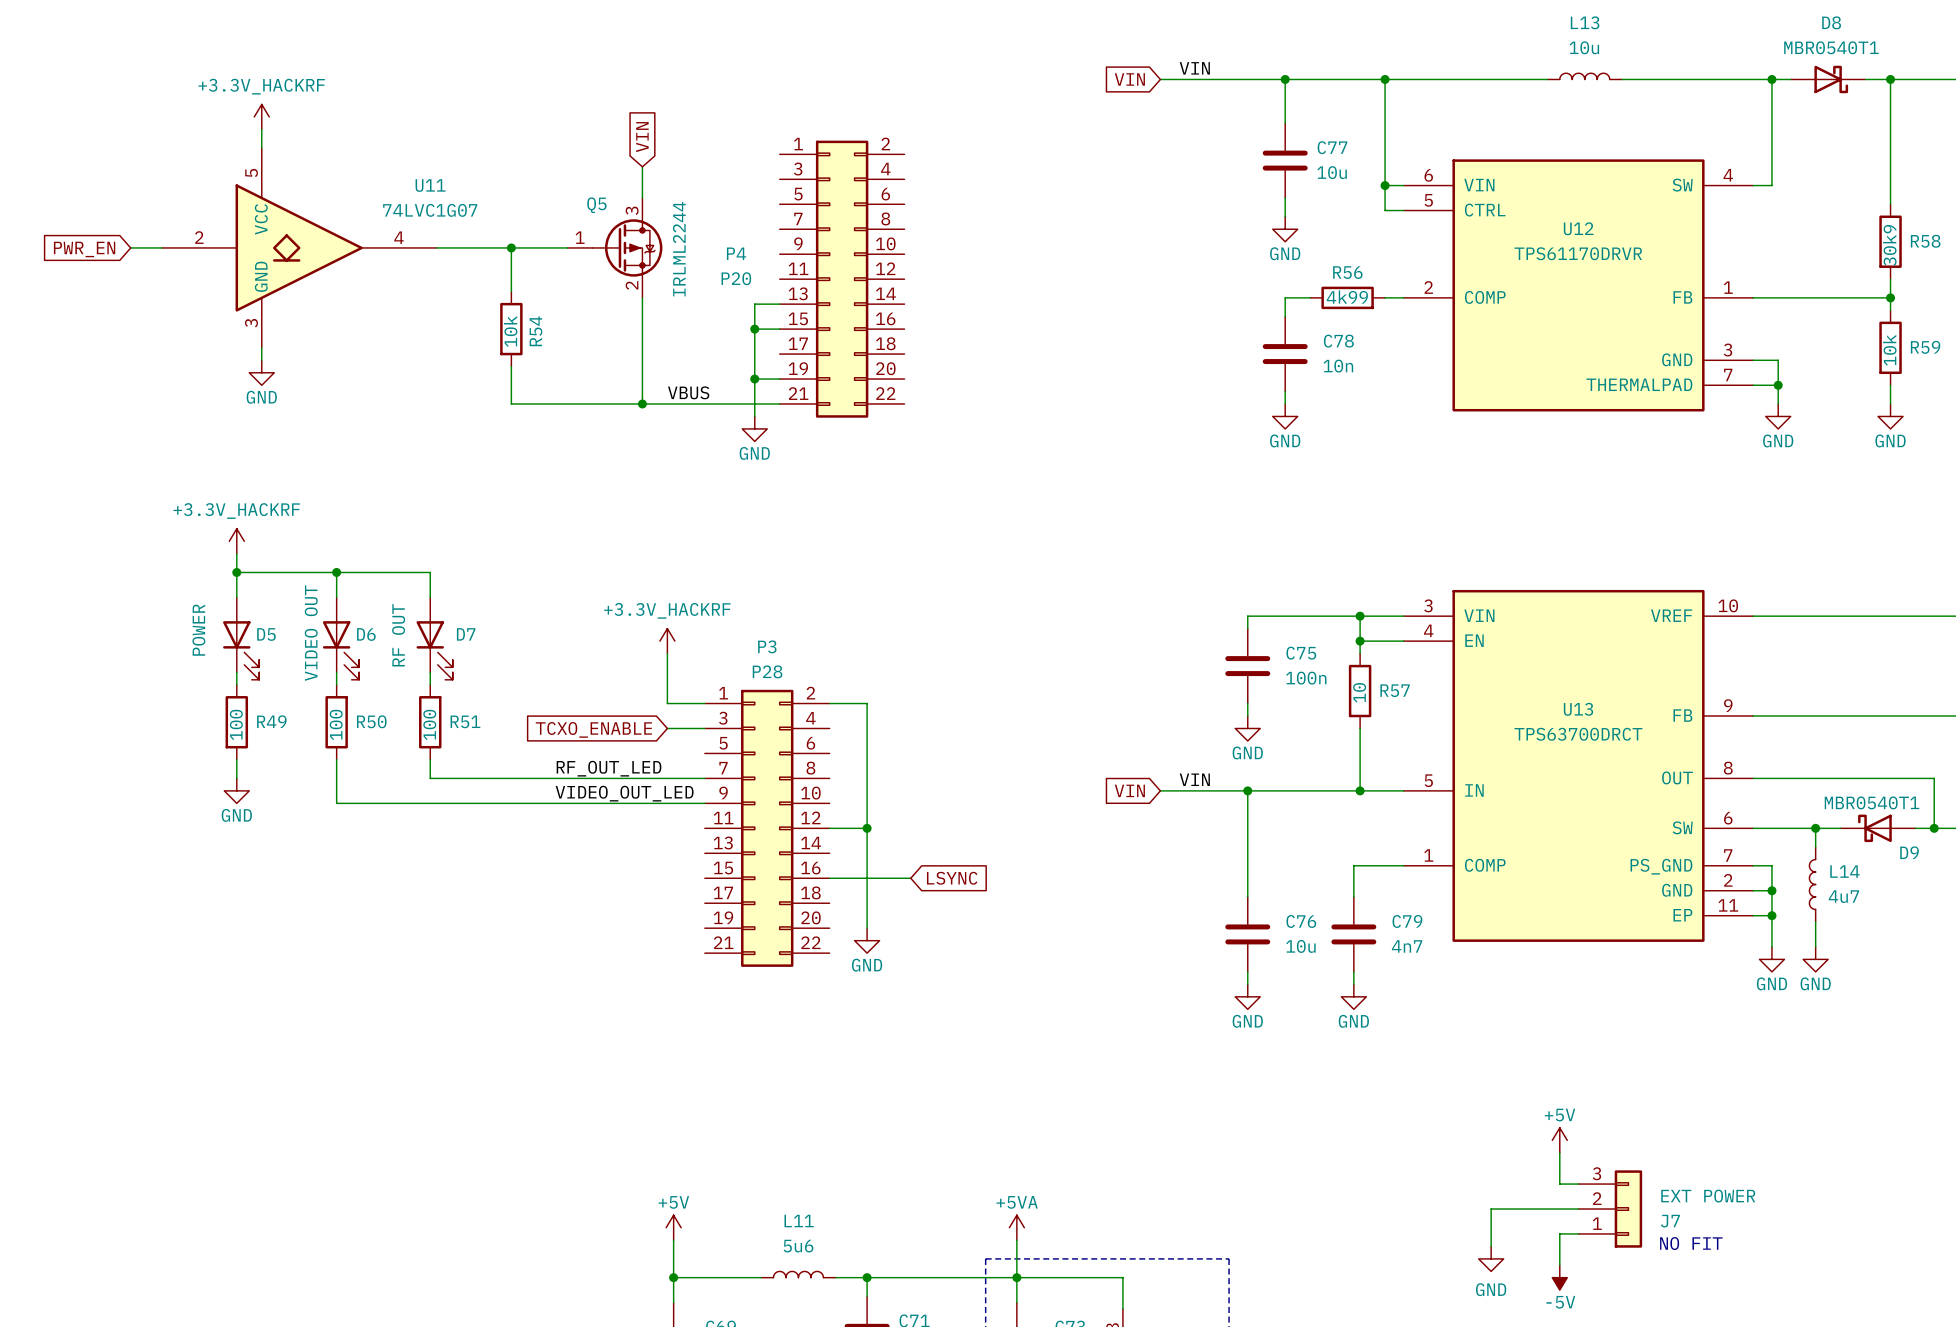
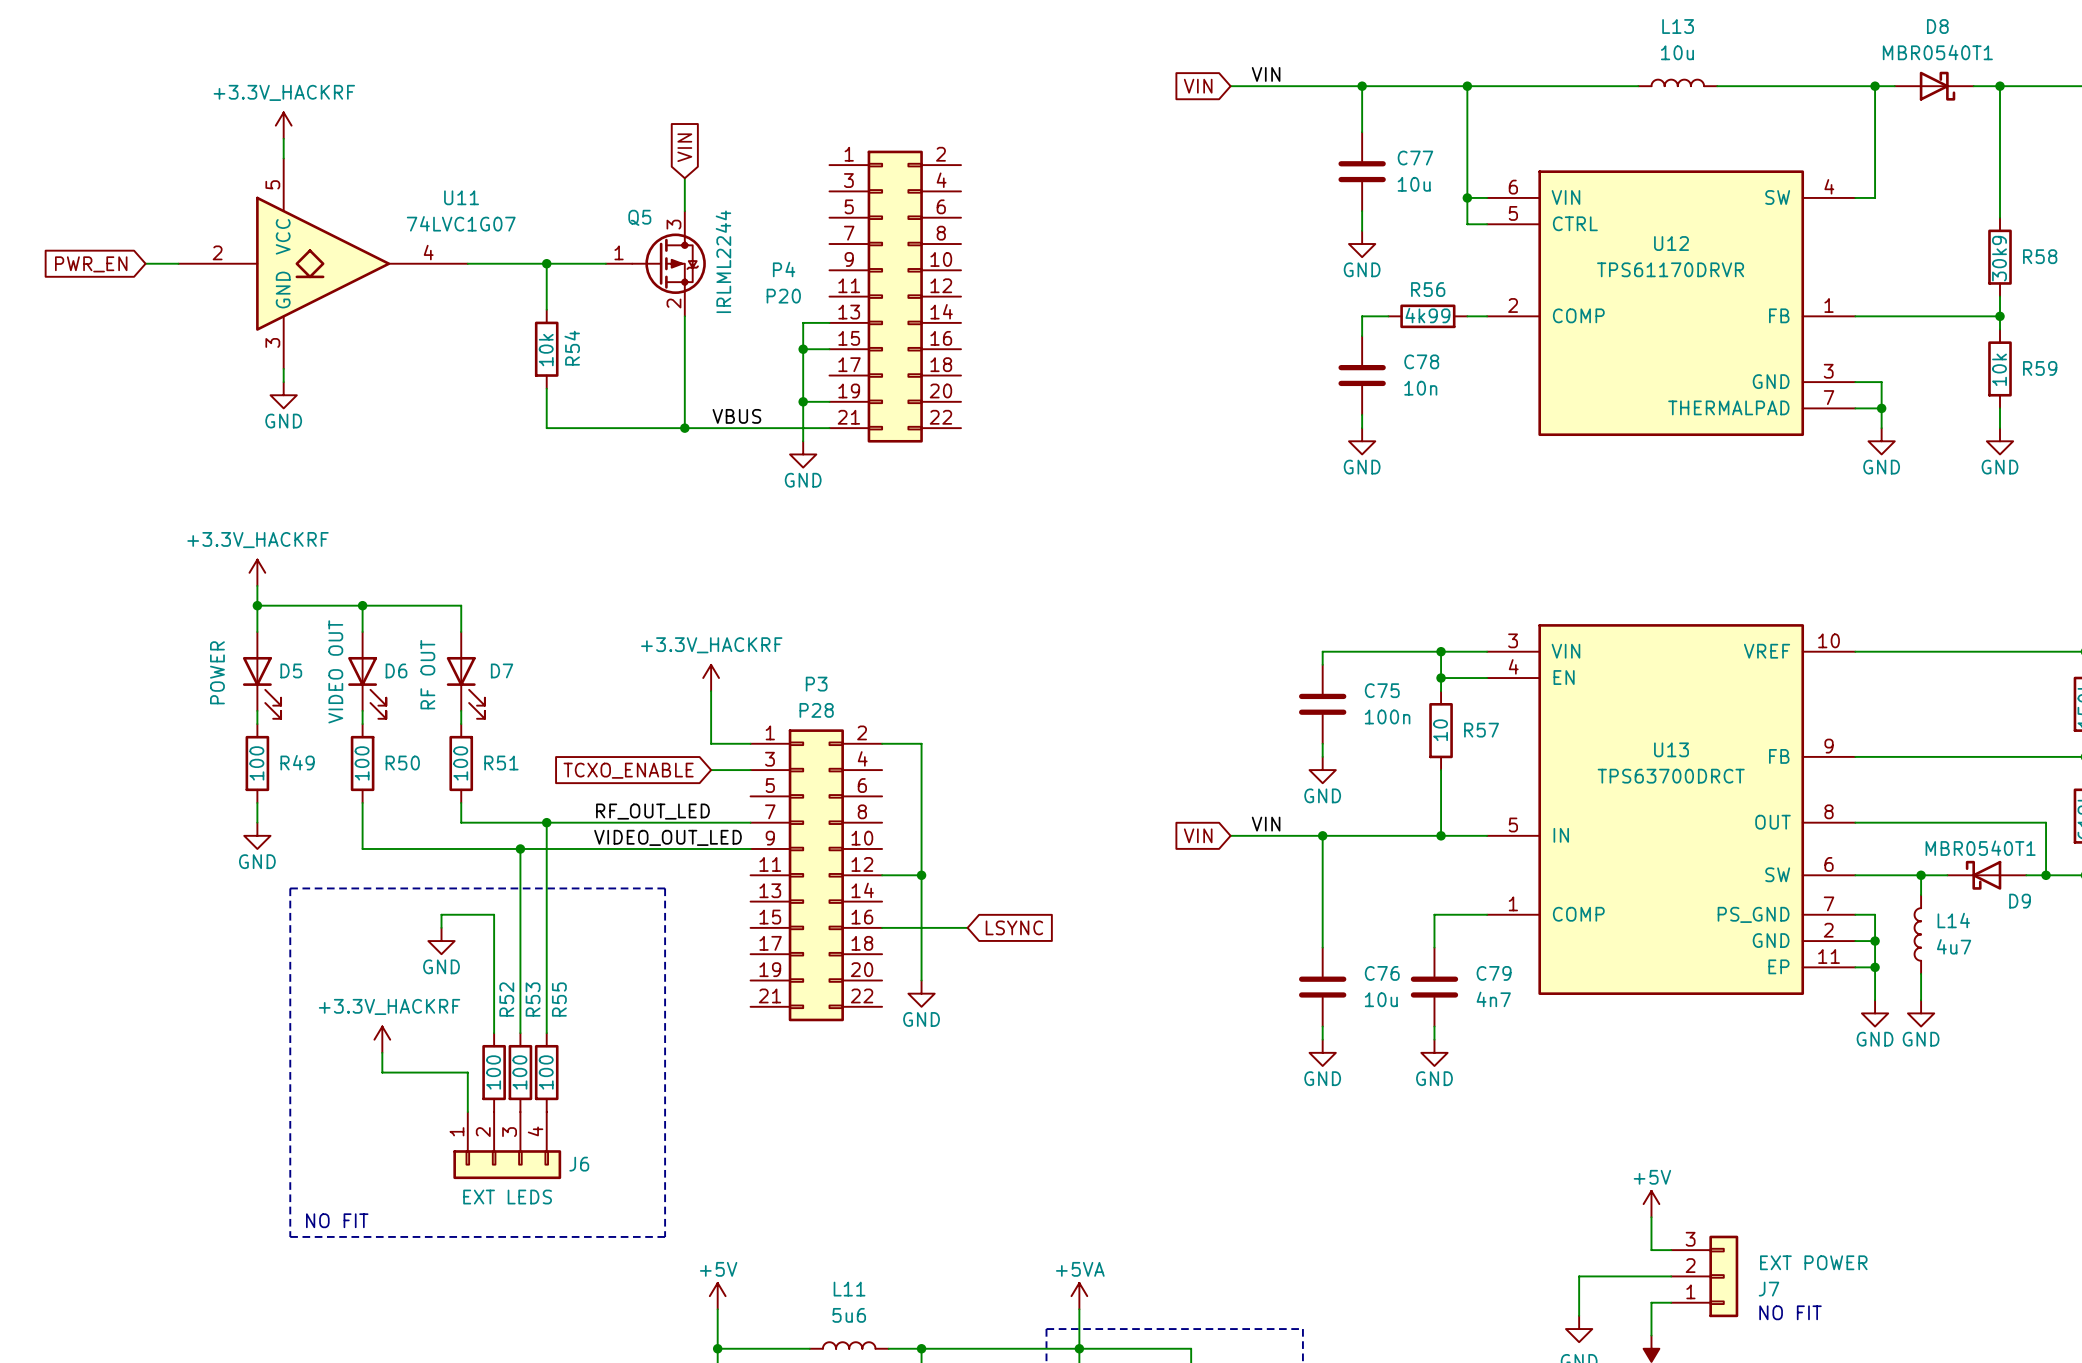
wire: none -> (546, 822) (546, 1033)
junction: none -> (546, 822)
wire: none -> (520, 848) (520, 1033)
junction: none -> (520, 848)
line: none -> (290, 888) (665, 888) (665, 1236) (290, 1236) (290, 888)
wire: none -> (441, 927) (441, 914) (494, 914) (494, 1033)
power symbol: none -> GND (441, 941)
power symbol: none -> +3.3V_HACKRF (382, 1039)
wire: none -> (382, 1052) (382, 1072) (467, 1072) (467, 1112)
R52: none -> 100 (494, 1072)
R53: none -> 100 (520, 1072)
R55: none -> 100 (546, 1072)
J6: none -> EXT LEDS (507, 1145)
text: none -> NO FIT (337, 1220)

